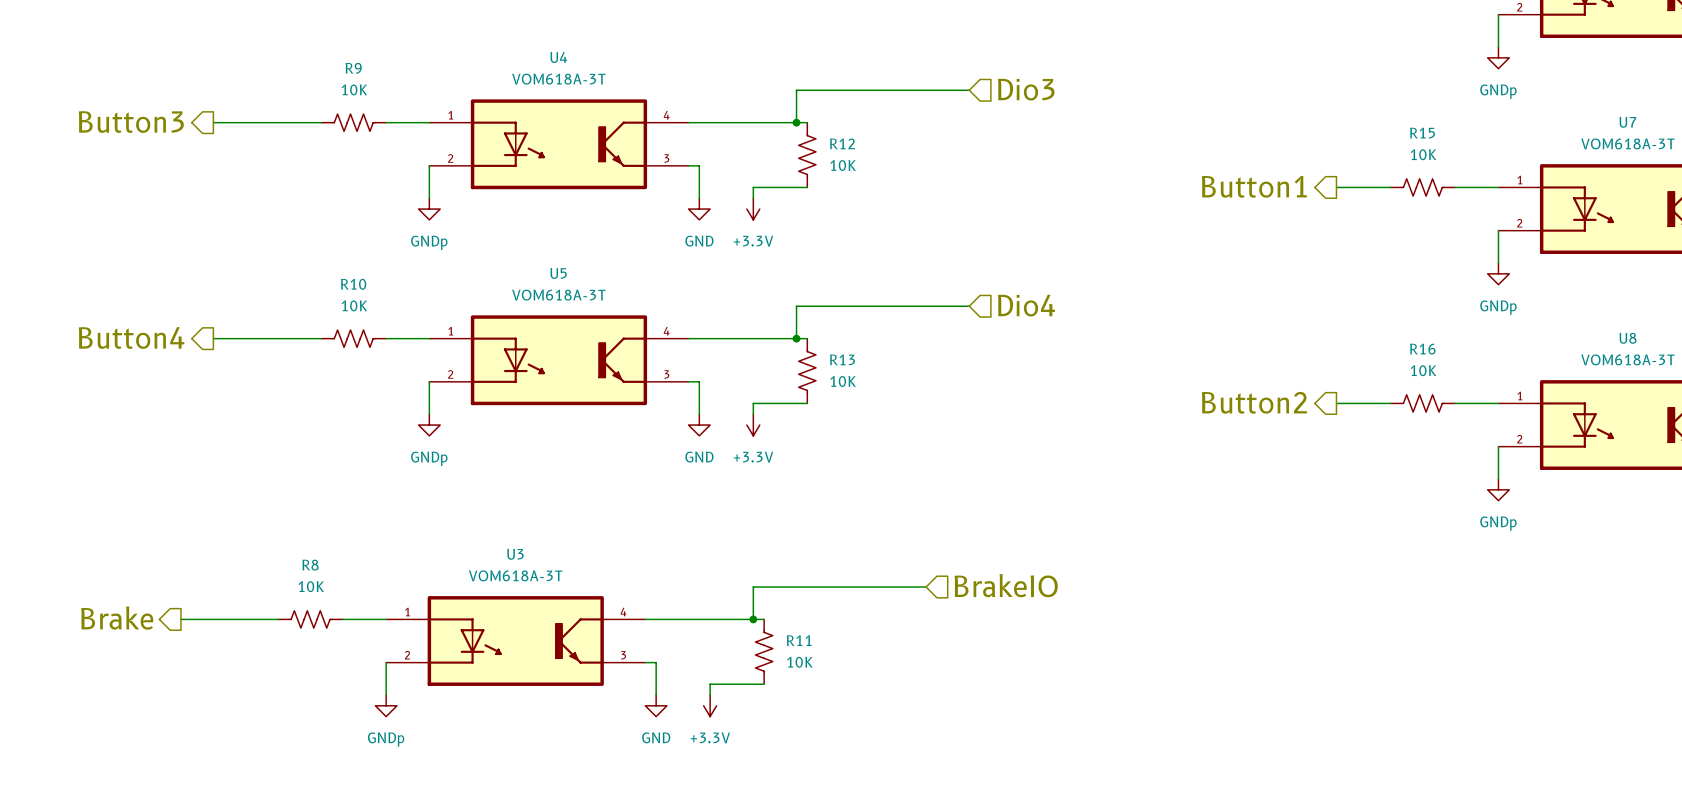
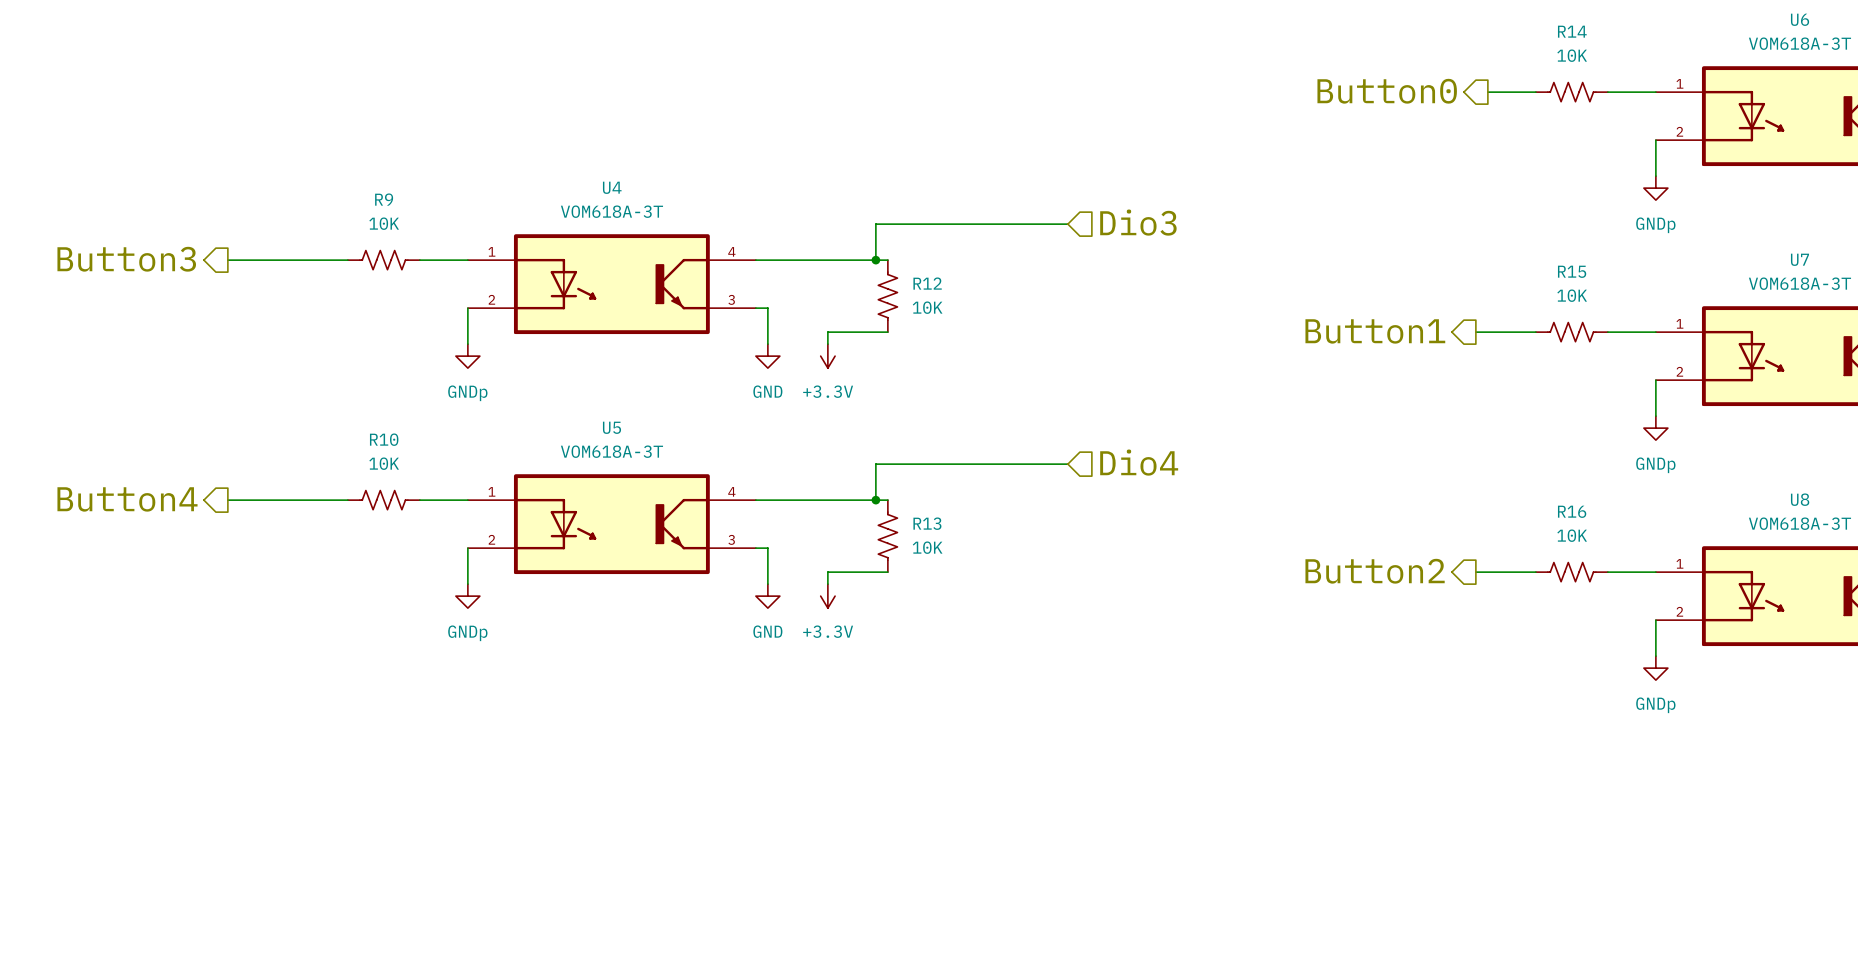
hierarchical label: BrakeIO (1006, 585) -> none
wire: (926, 587) (753, 587) (753, 619) -> none
hierarchical label: Brake (117, 618) -> none
wire: (180, 619) (278, 619) -> none
R8: 10K (310, 619) -> none
wire: (342, 619) (386, 619) -> none
wire: (645, 619) (764, 619) -> none
junction: (753, 619) -> none
U3: VOM618A-3T (515, 641) -> none
R11: 10K (764, 651) -> none
wire: (386, 662) (386, 695) -> none
wire: (645, 662) (656, 662) (656, 695) -> none
wire: (764, 684) (710, 684) (710, 695) -> none
power symbol: GNDp (386, 705) -> none
power symbol: GND (656, 705) -> none
power symbol: +3.3V (710, 705) -> none

